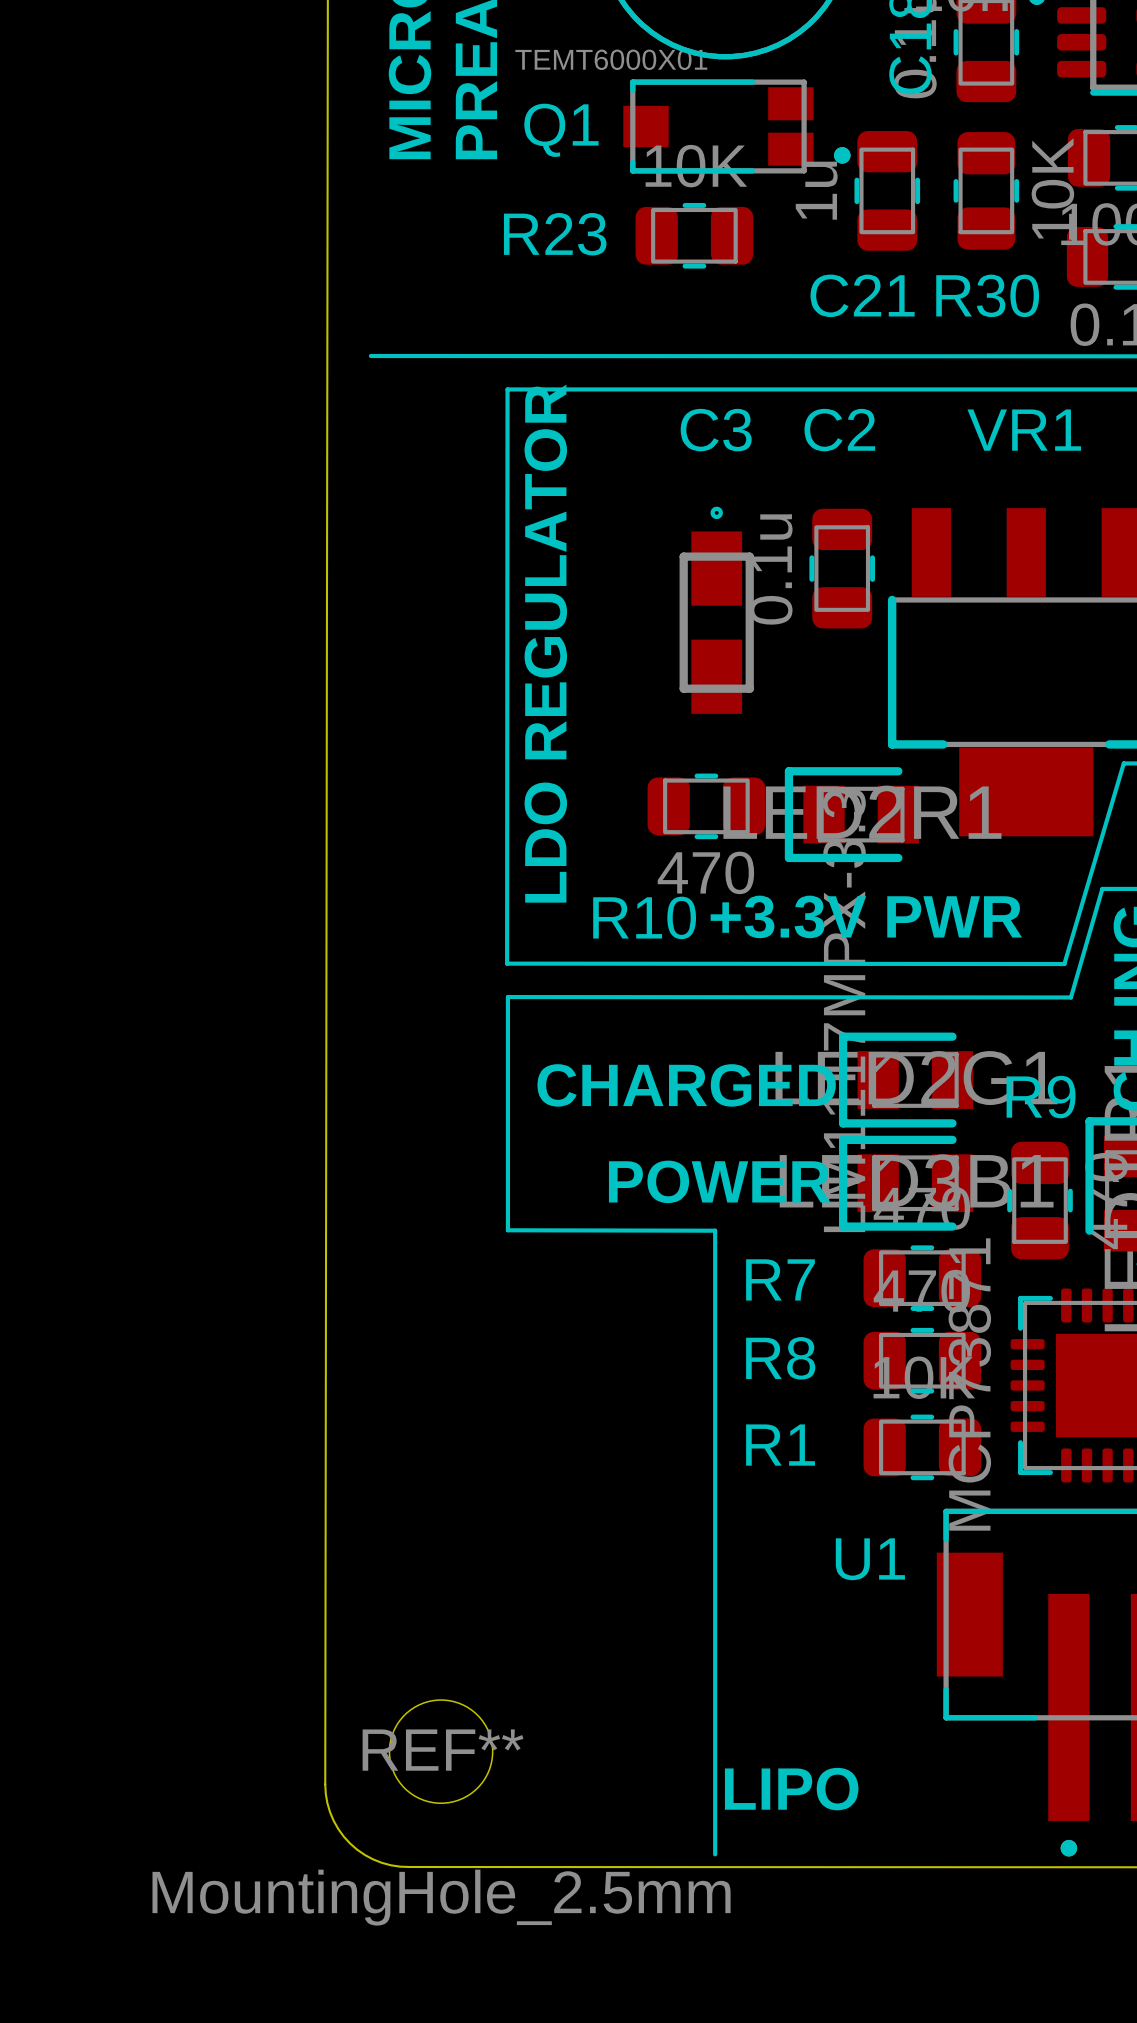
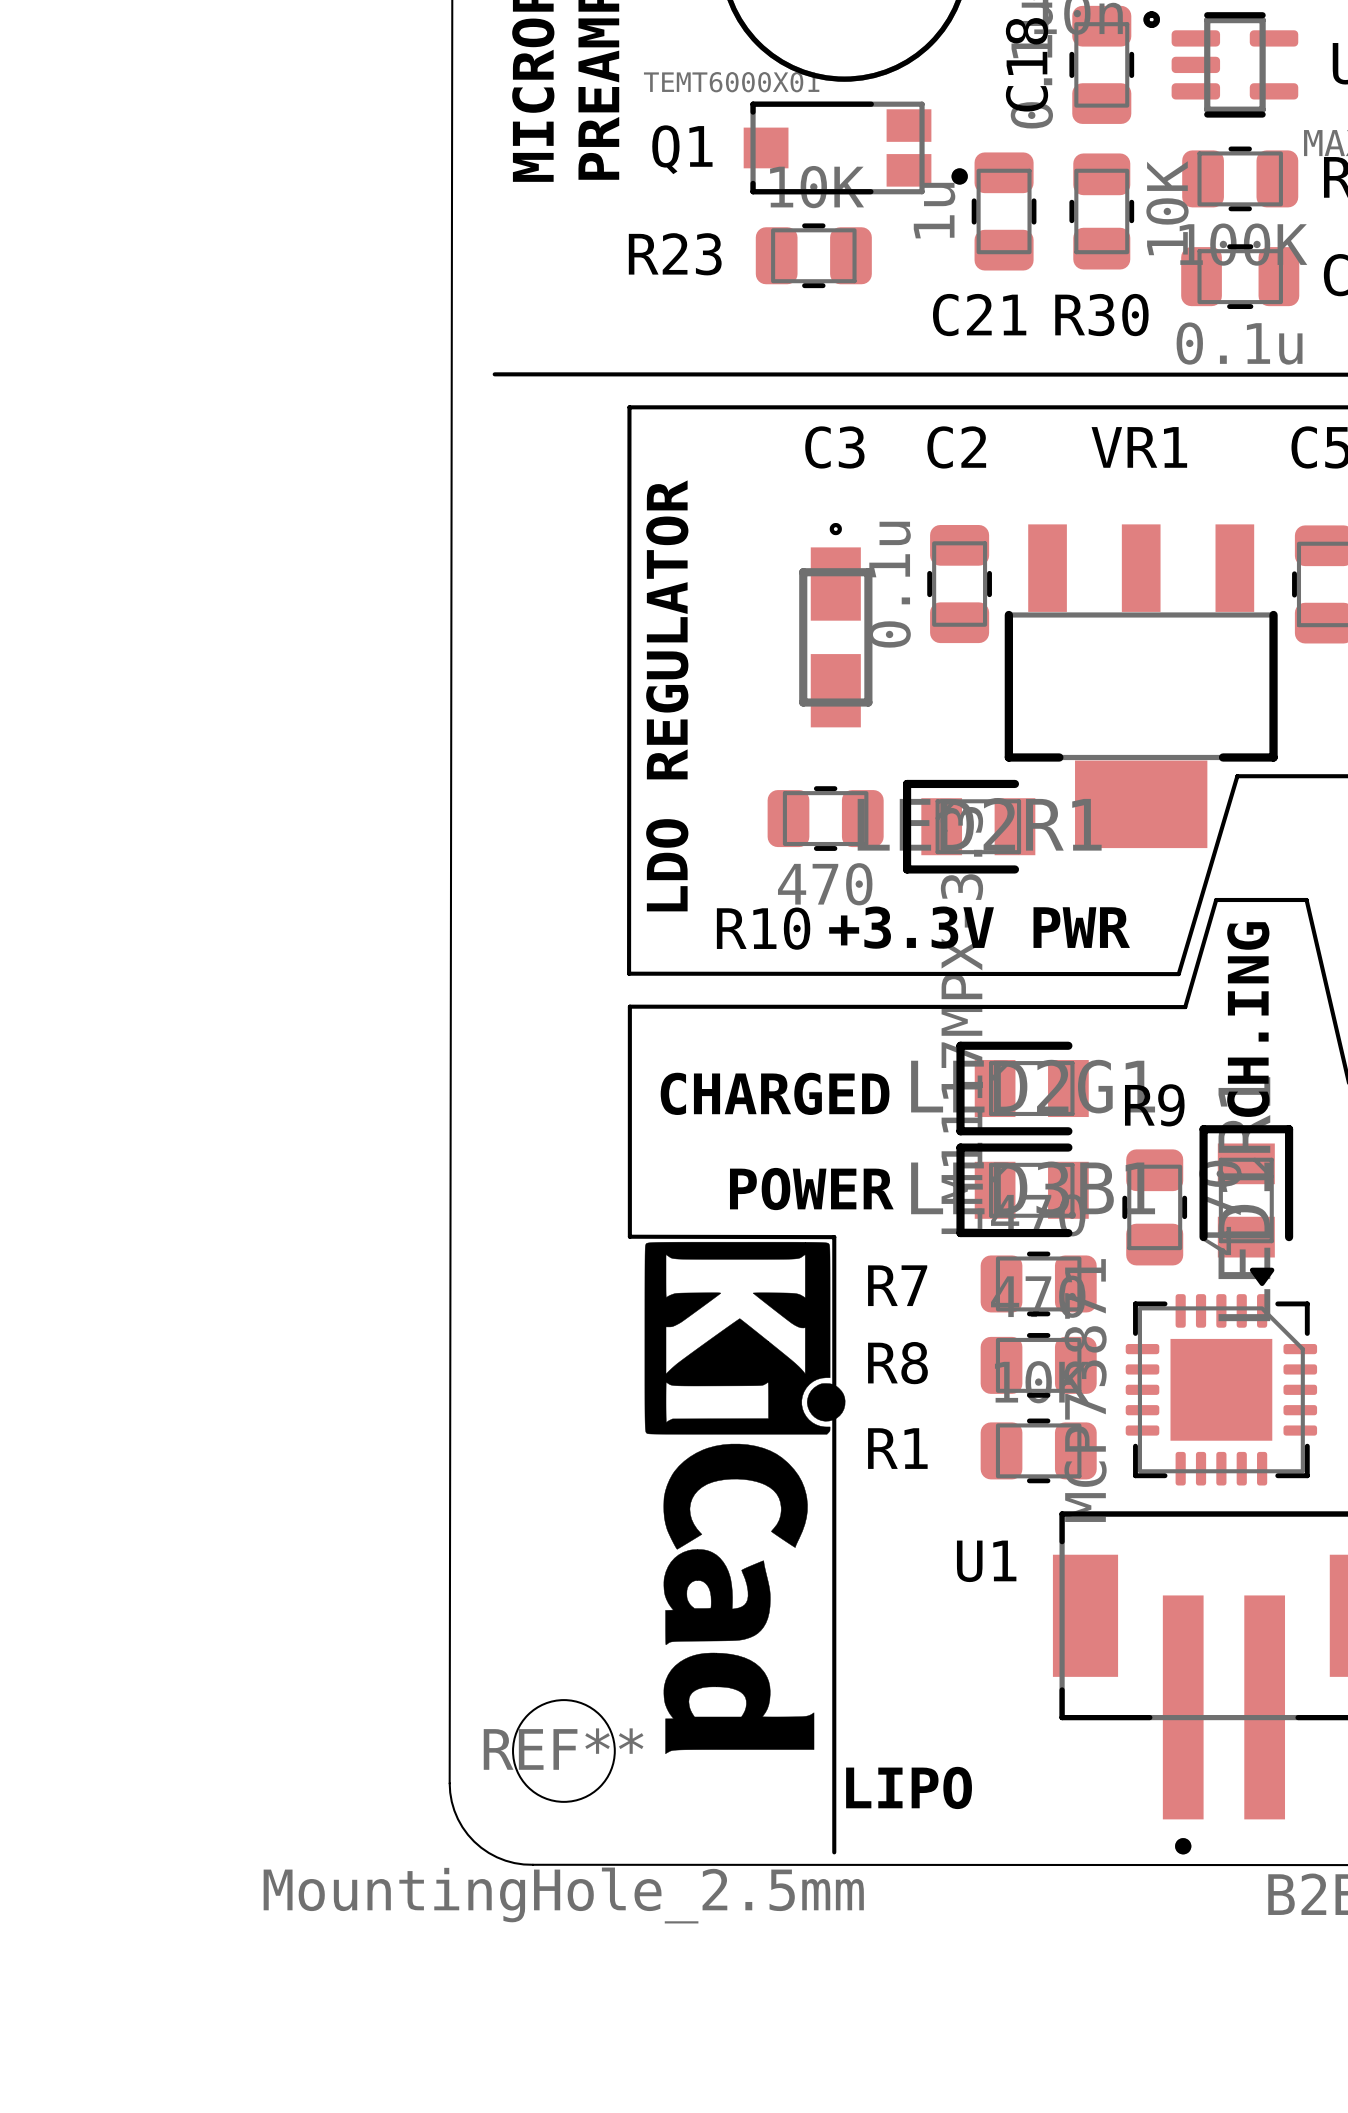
drawing: none -> [644, 1241, 846, 1754]

